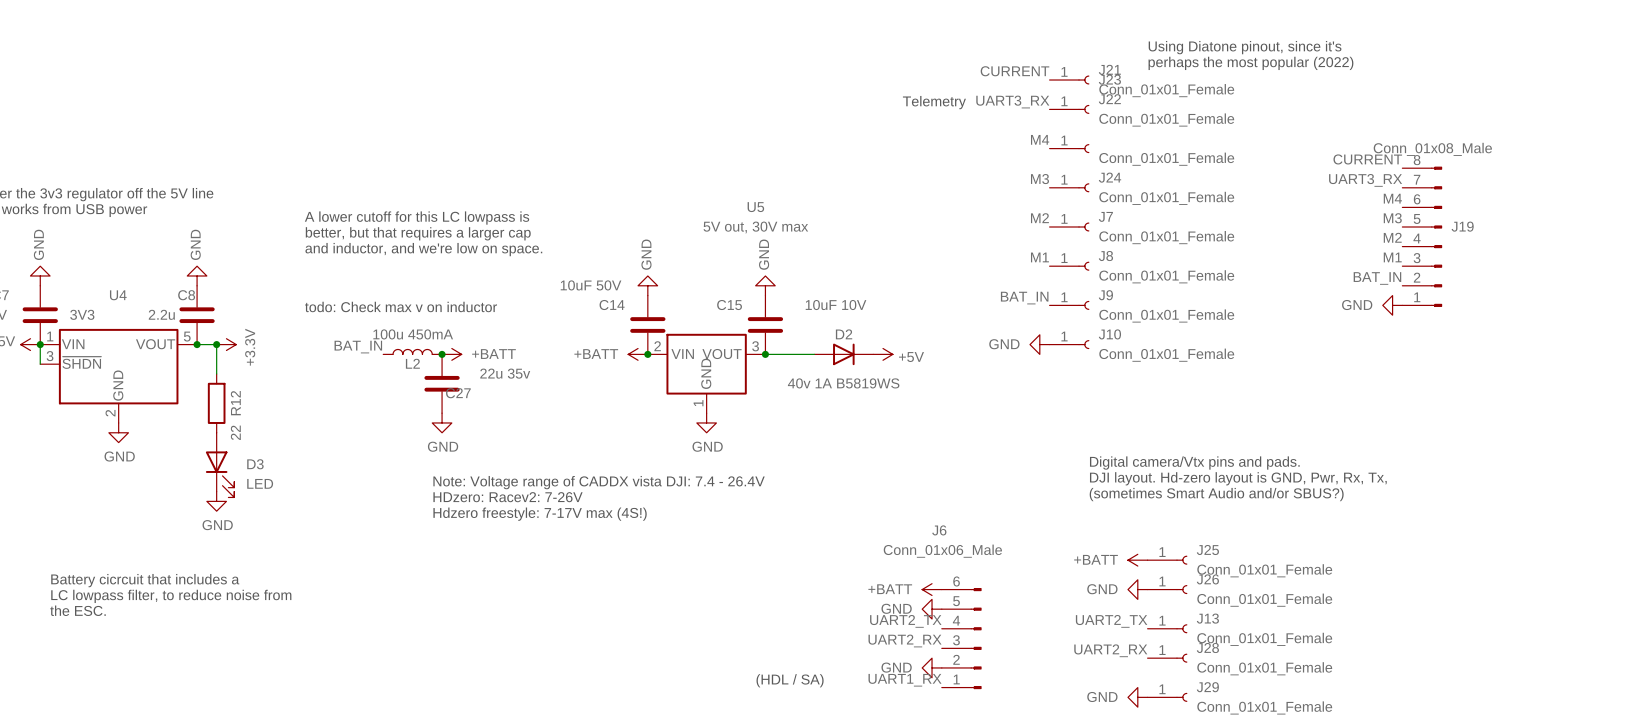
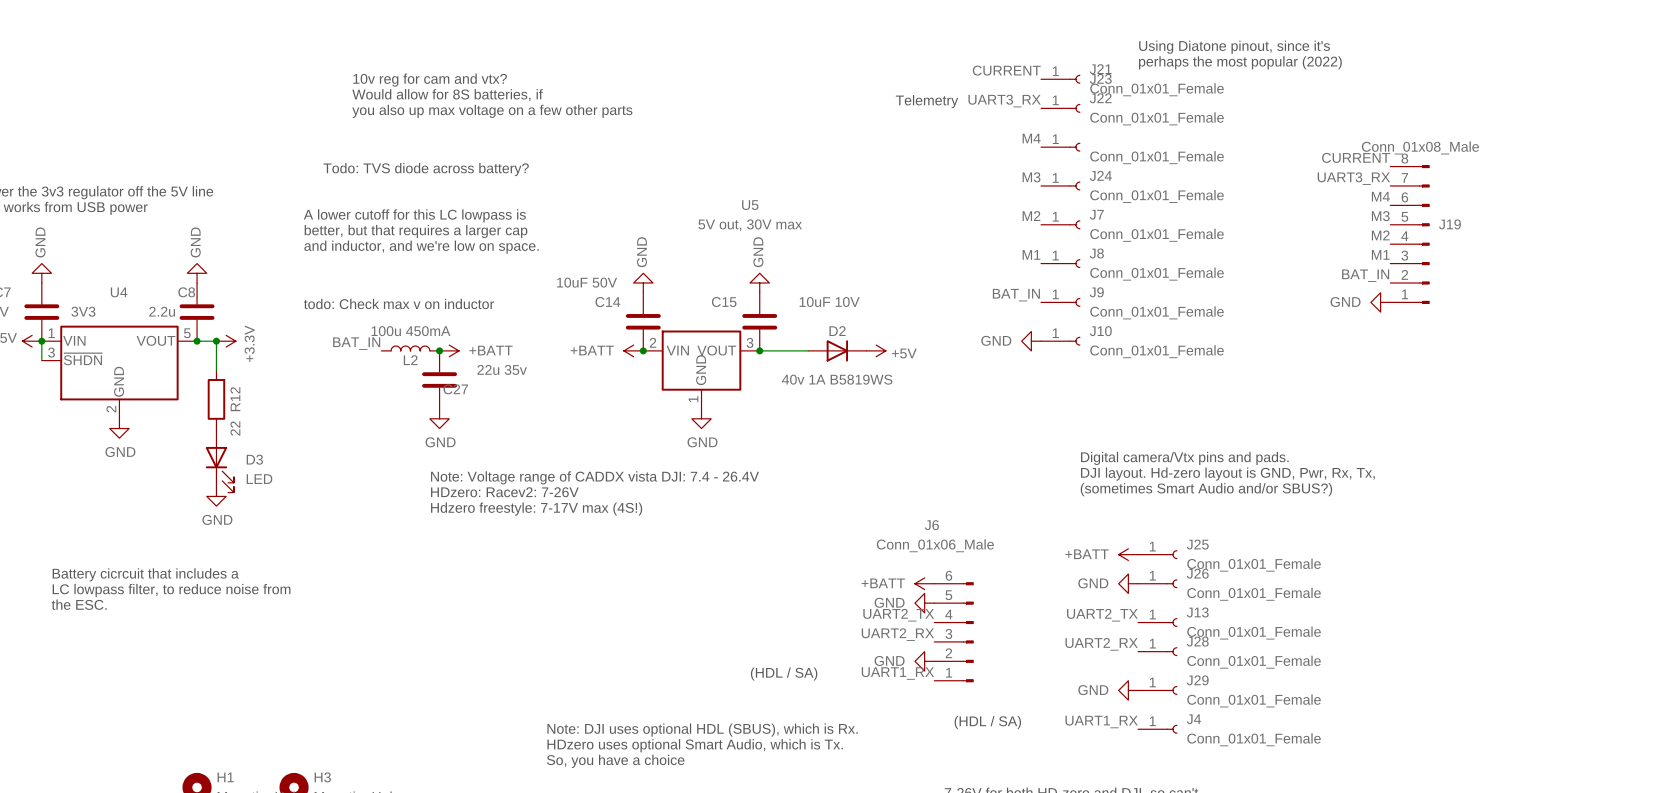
text: none -> 10v reg for cam and vtx? (430, 80)
text: none -> Would allow for 8S batteries, if (447, 95)
text: none -> you also up max voltage on a few other parts (492, 111)
text: none -> Todo: TVS diode across battery? (426, 169)

